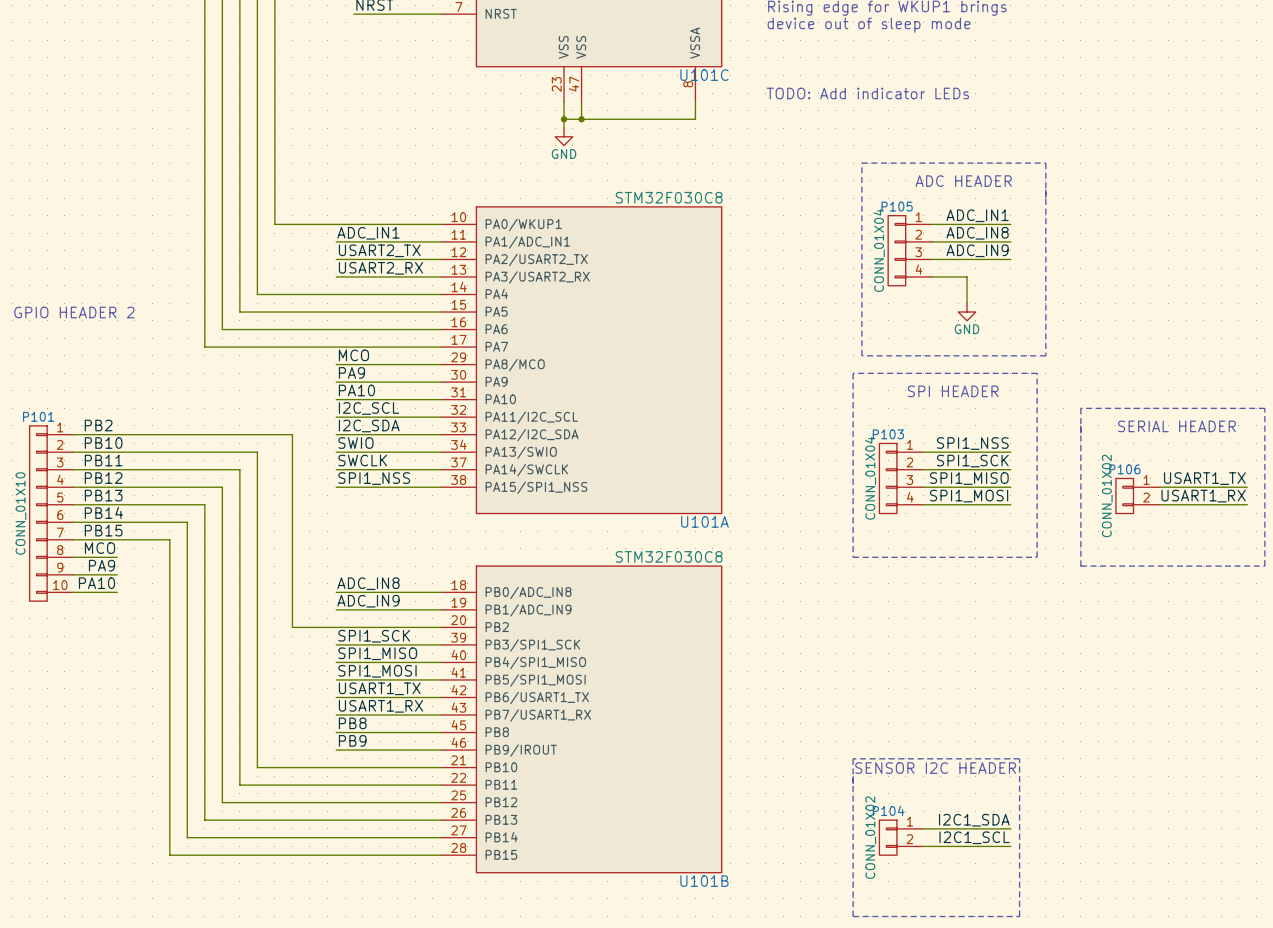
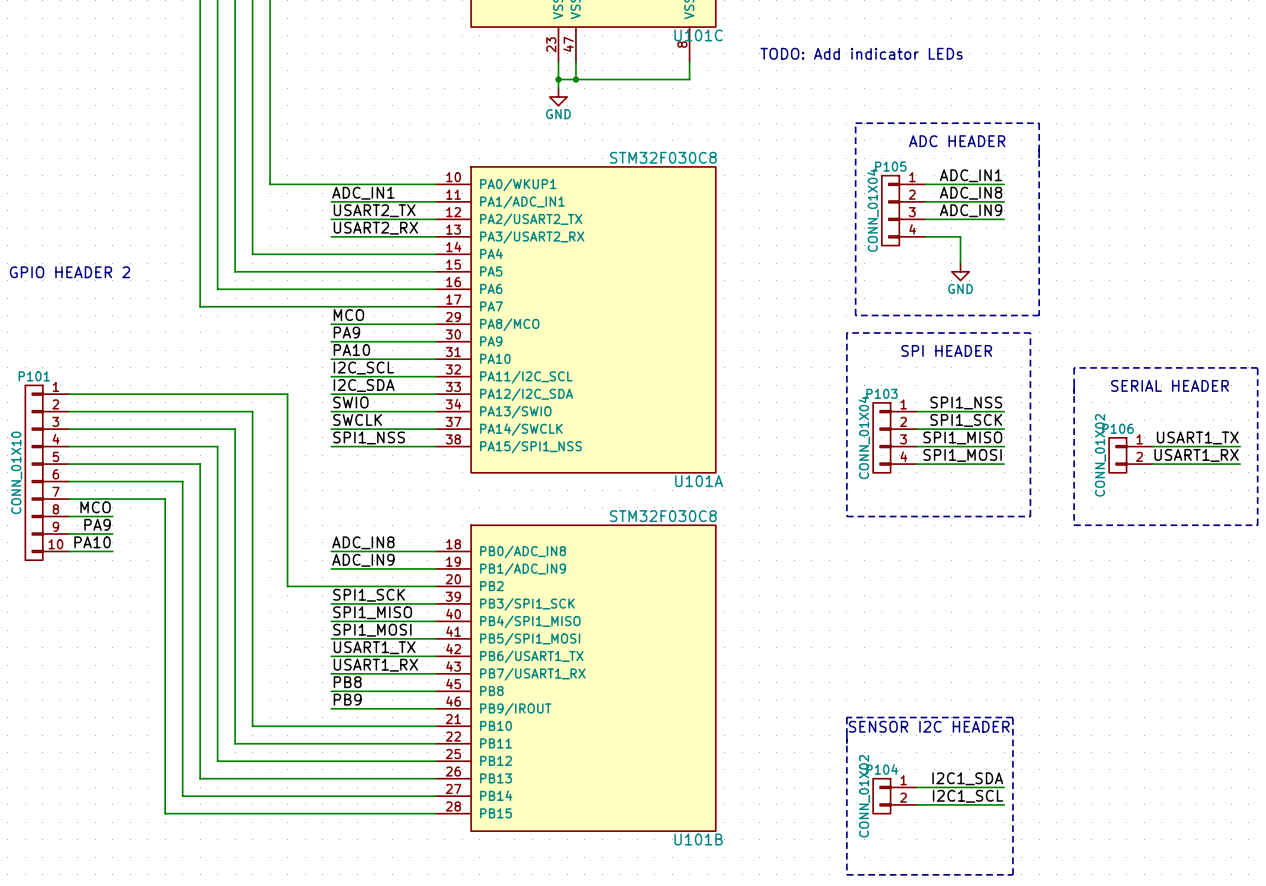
label: PB2 (98, 425) -> none
label: PB10 (103, 443) -> none
label: PB11 (103, 460) -> none
label: PB12 (103, 478) -> none
label: PB13 (103, 495) -> none
label: PB14 (103, 512) -> none
label: PB15 (103, 530) -> none

